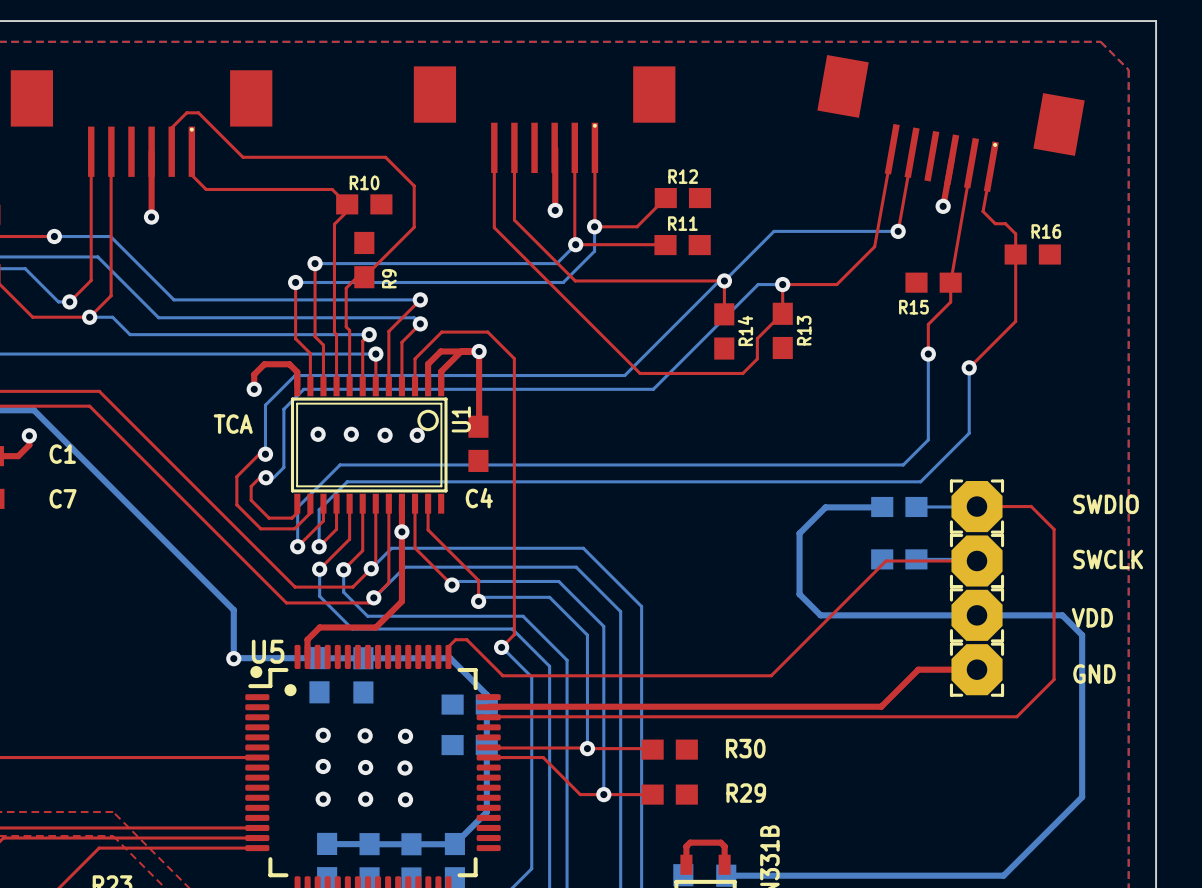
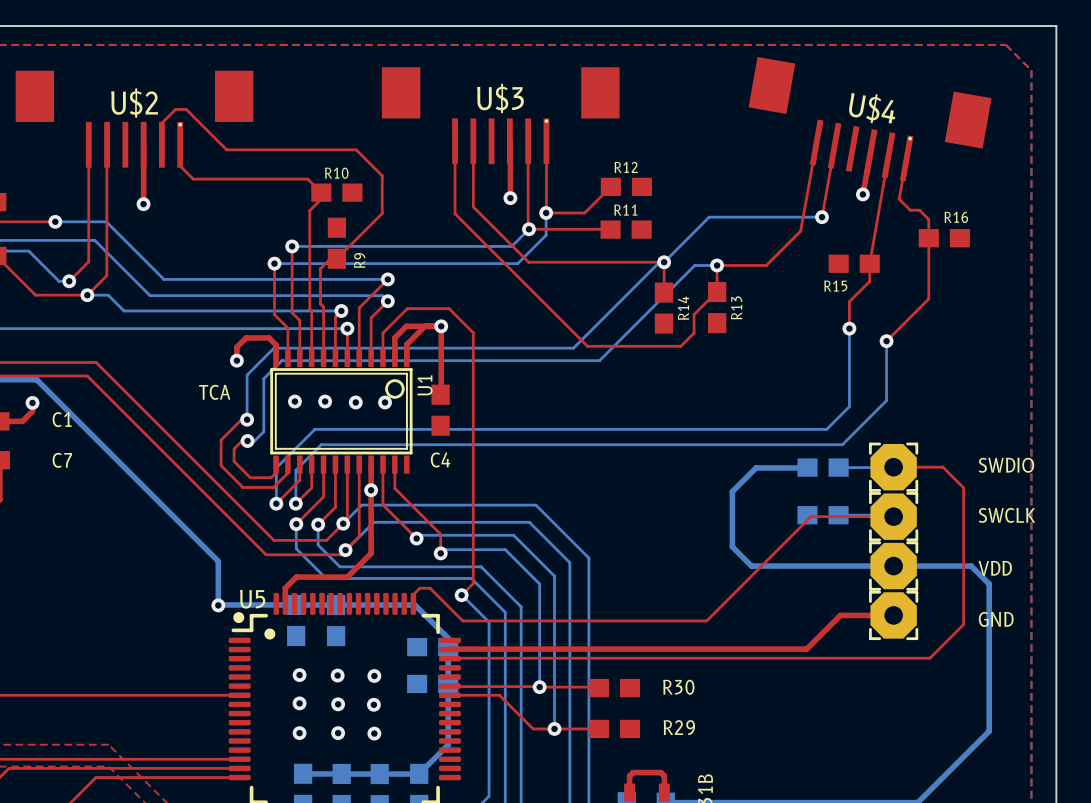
U$3 name: none -> U$3 (500, 98)
U$2 name: none -> U$2 (134, 102)
U$4 name: none -> U$4 (872, 108)

